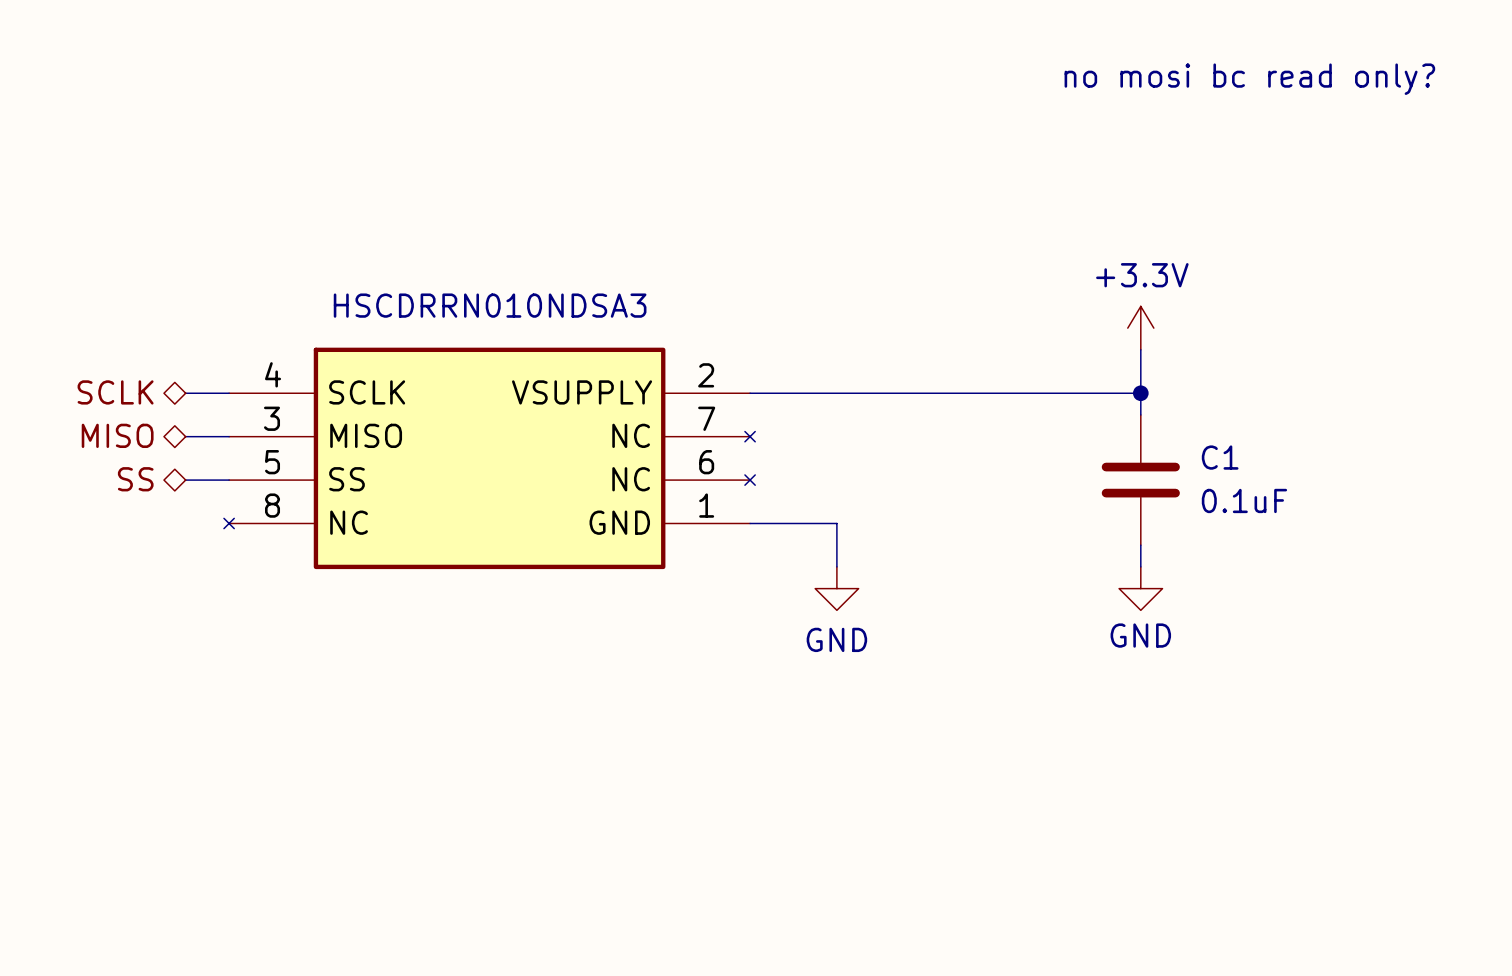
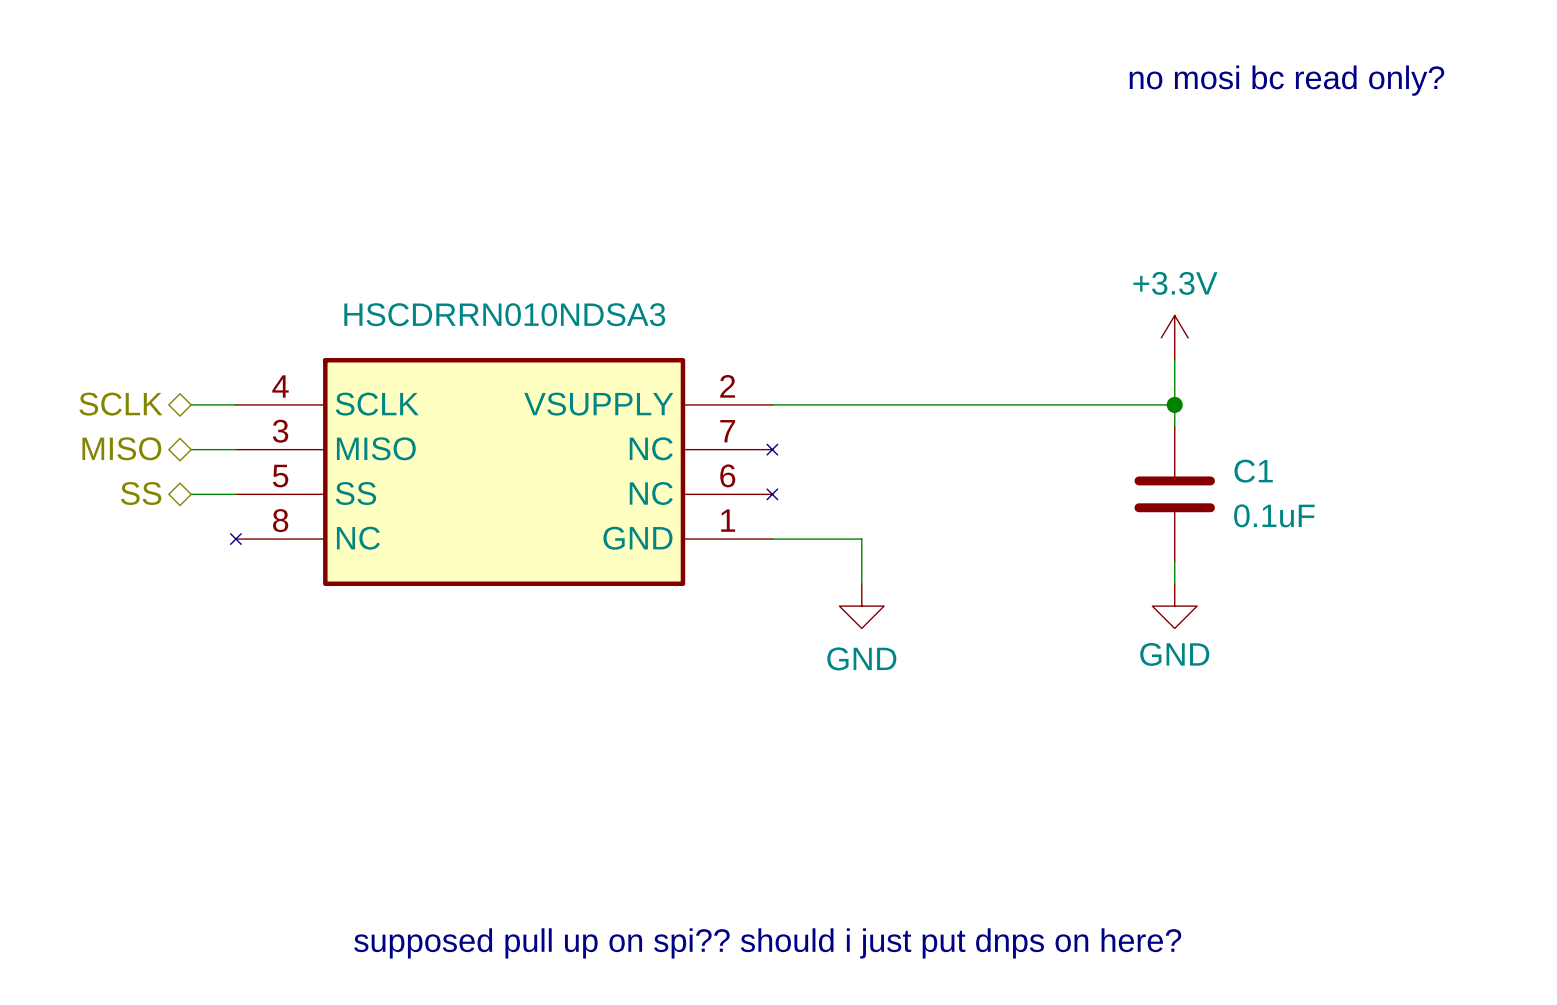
text: none -> supposed pull up on spi?? should i just put dnps on here? (767, 943)

